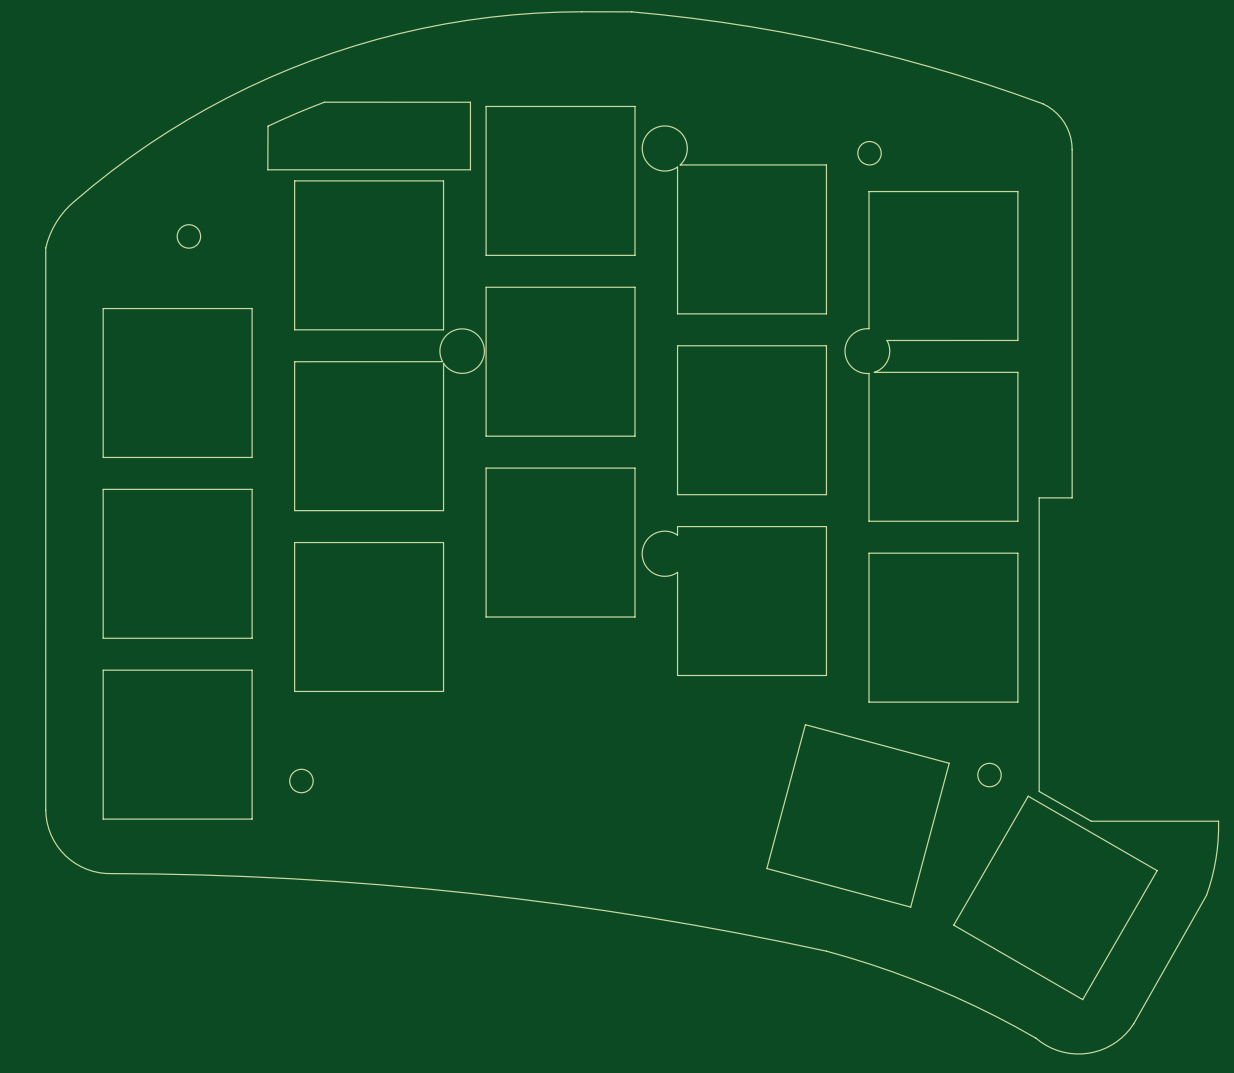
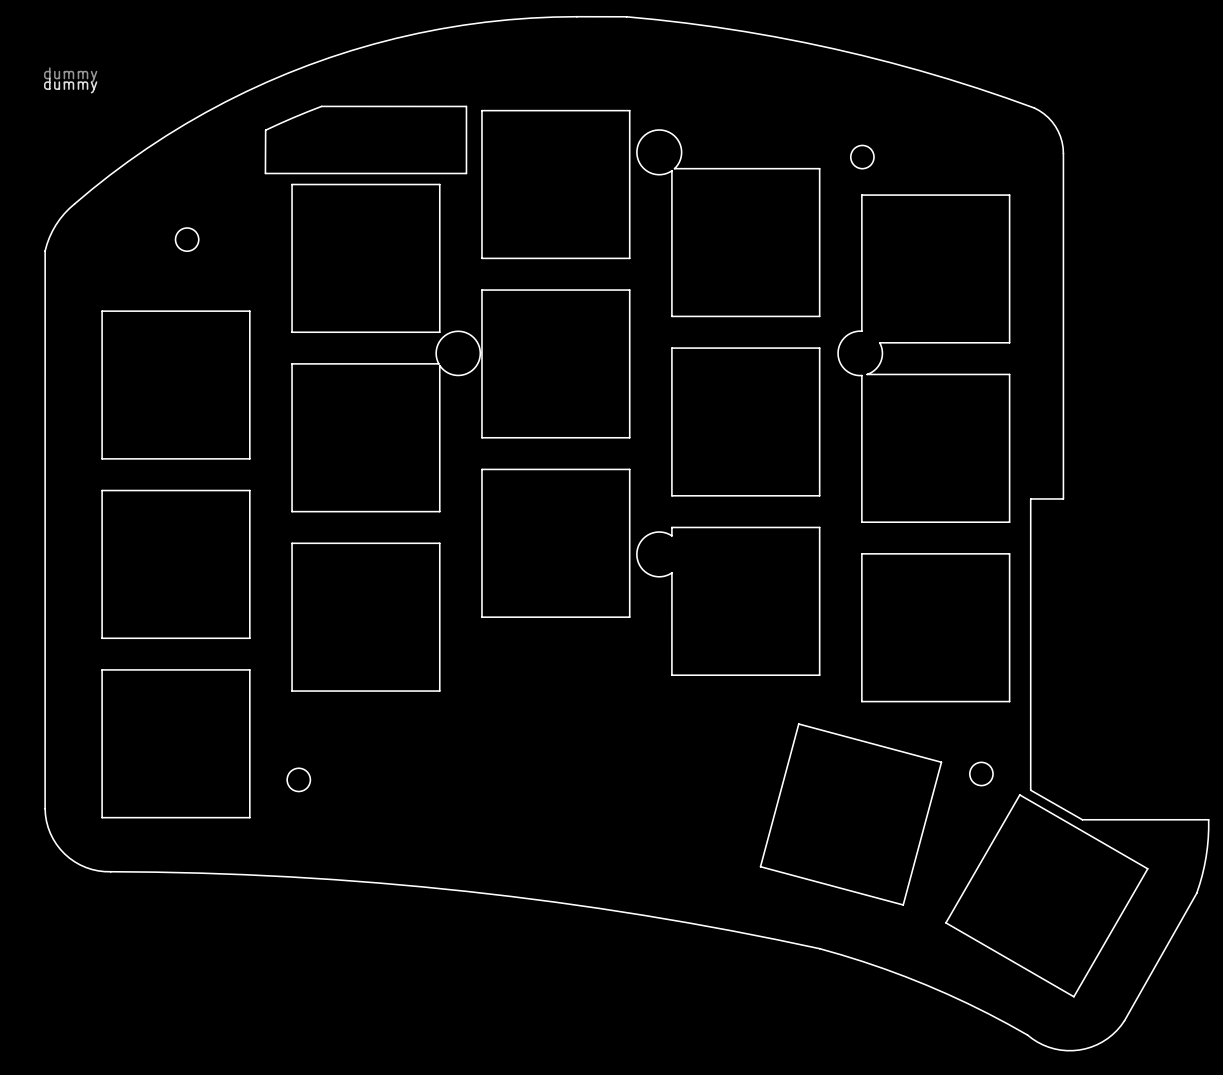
dummy: none -> dummy (70, 80)

